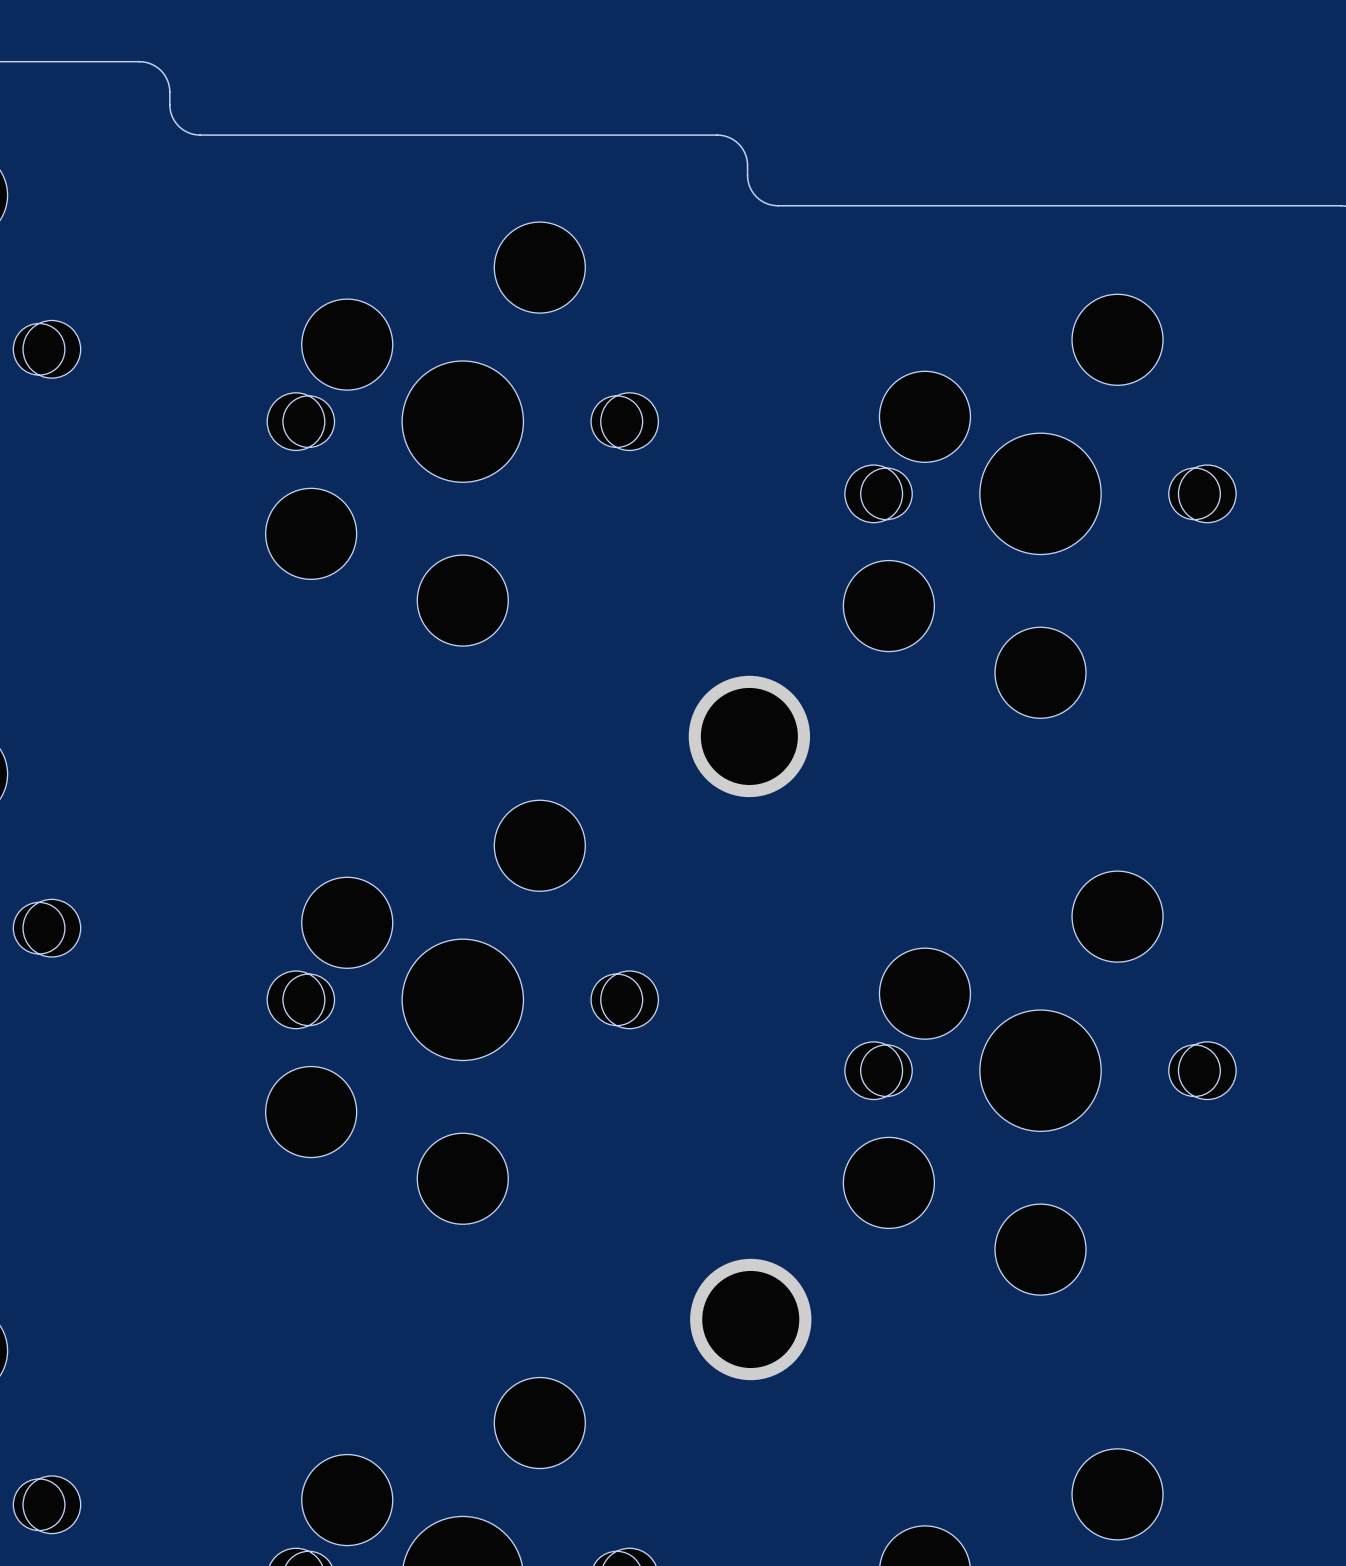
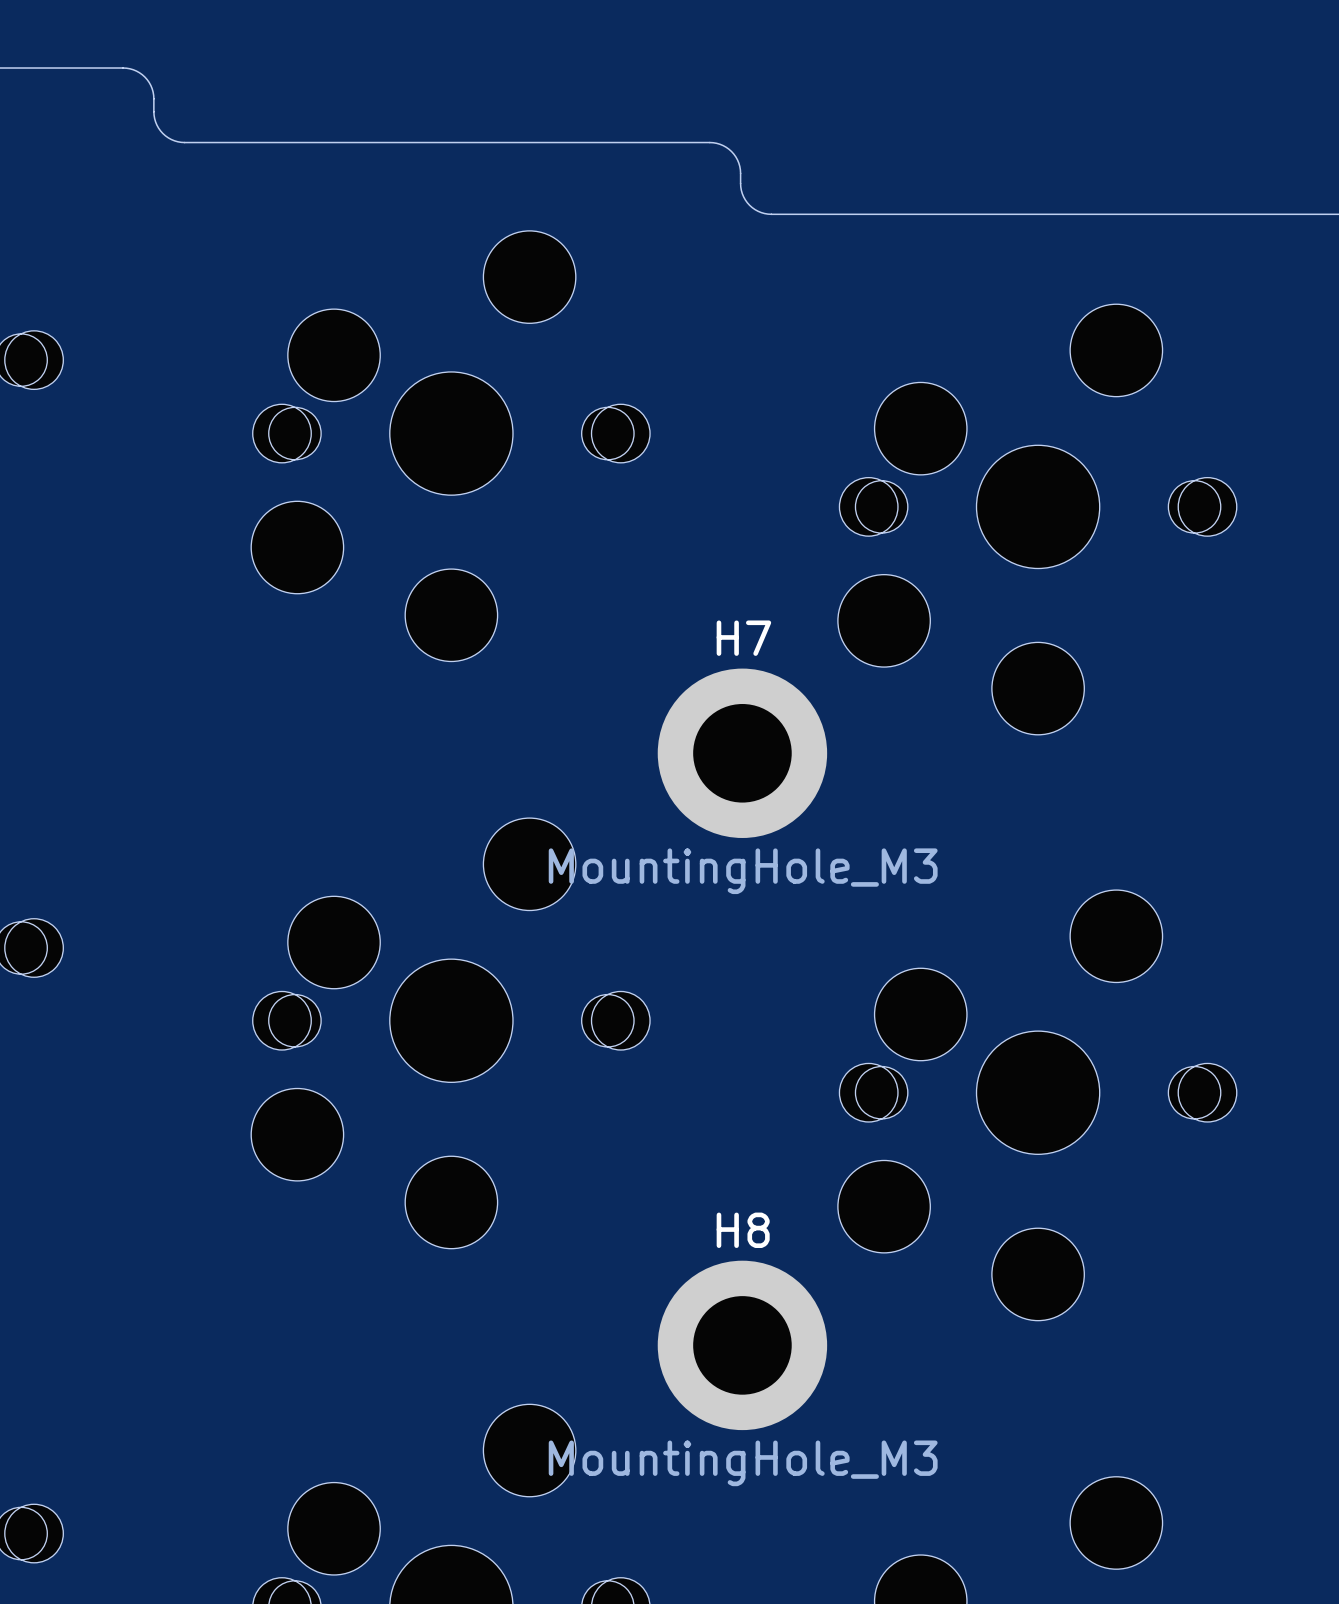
part: (749, 736) -> none
H7: none -> MountingHole_M3 (742, 753)
H8: none -> MountingHole_M3 (742, 1345)
part: (750, 1319) -> none

